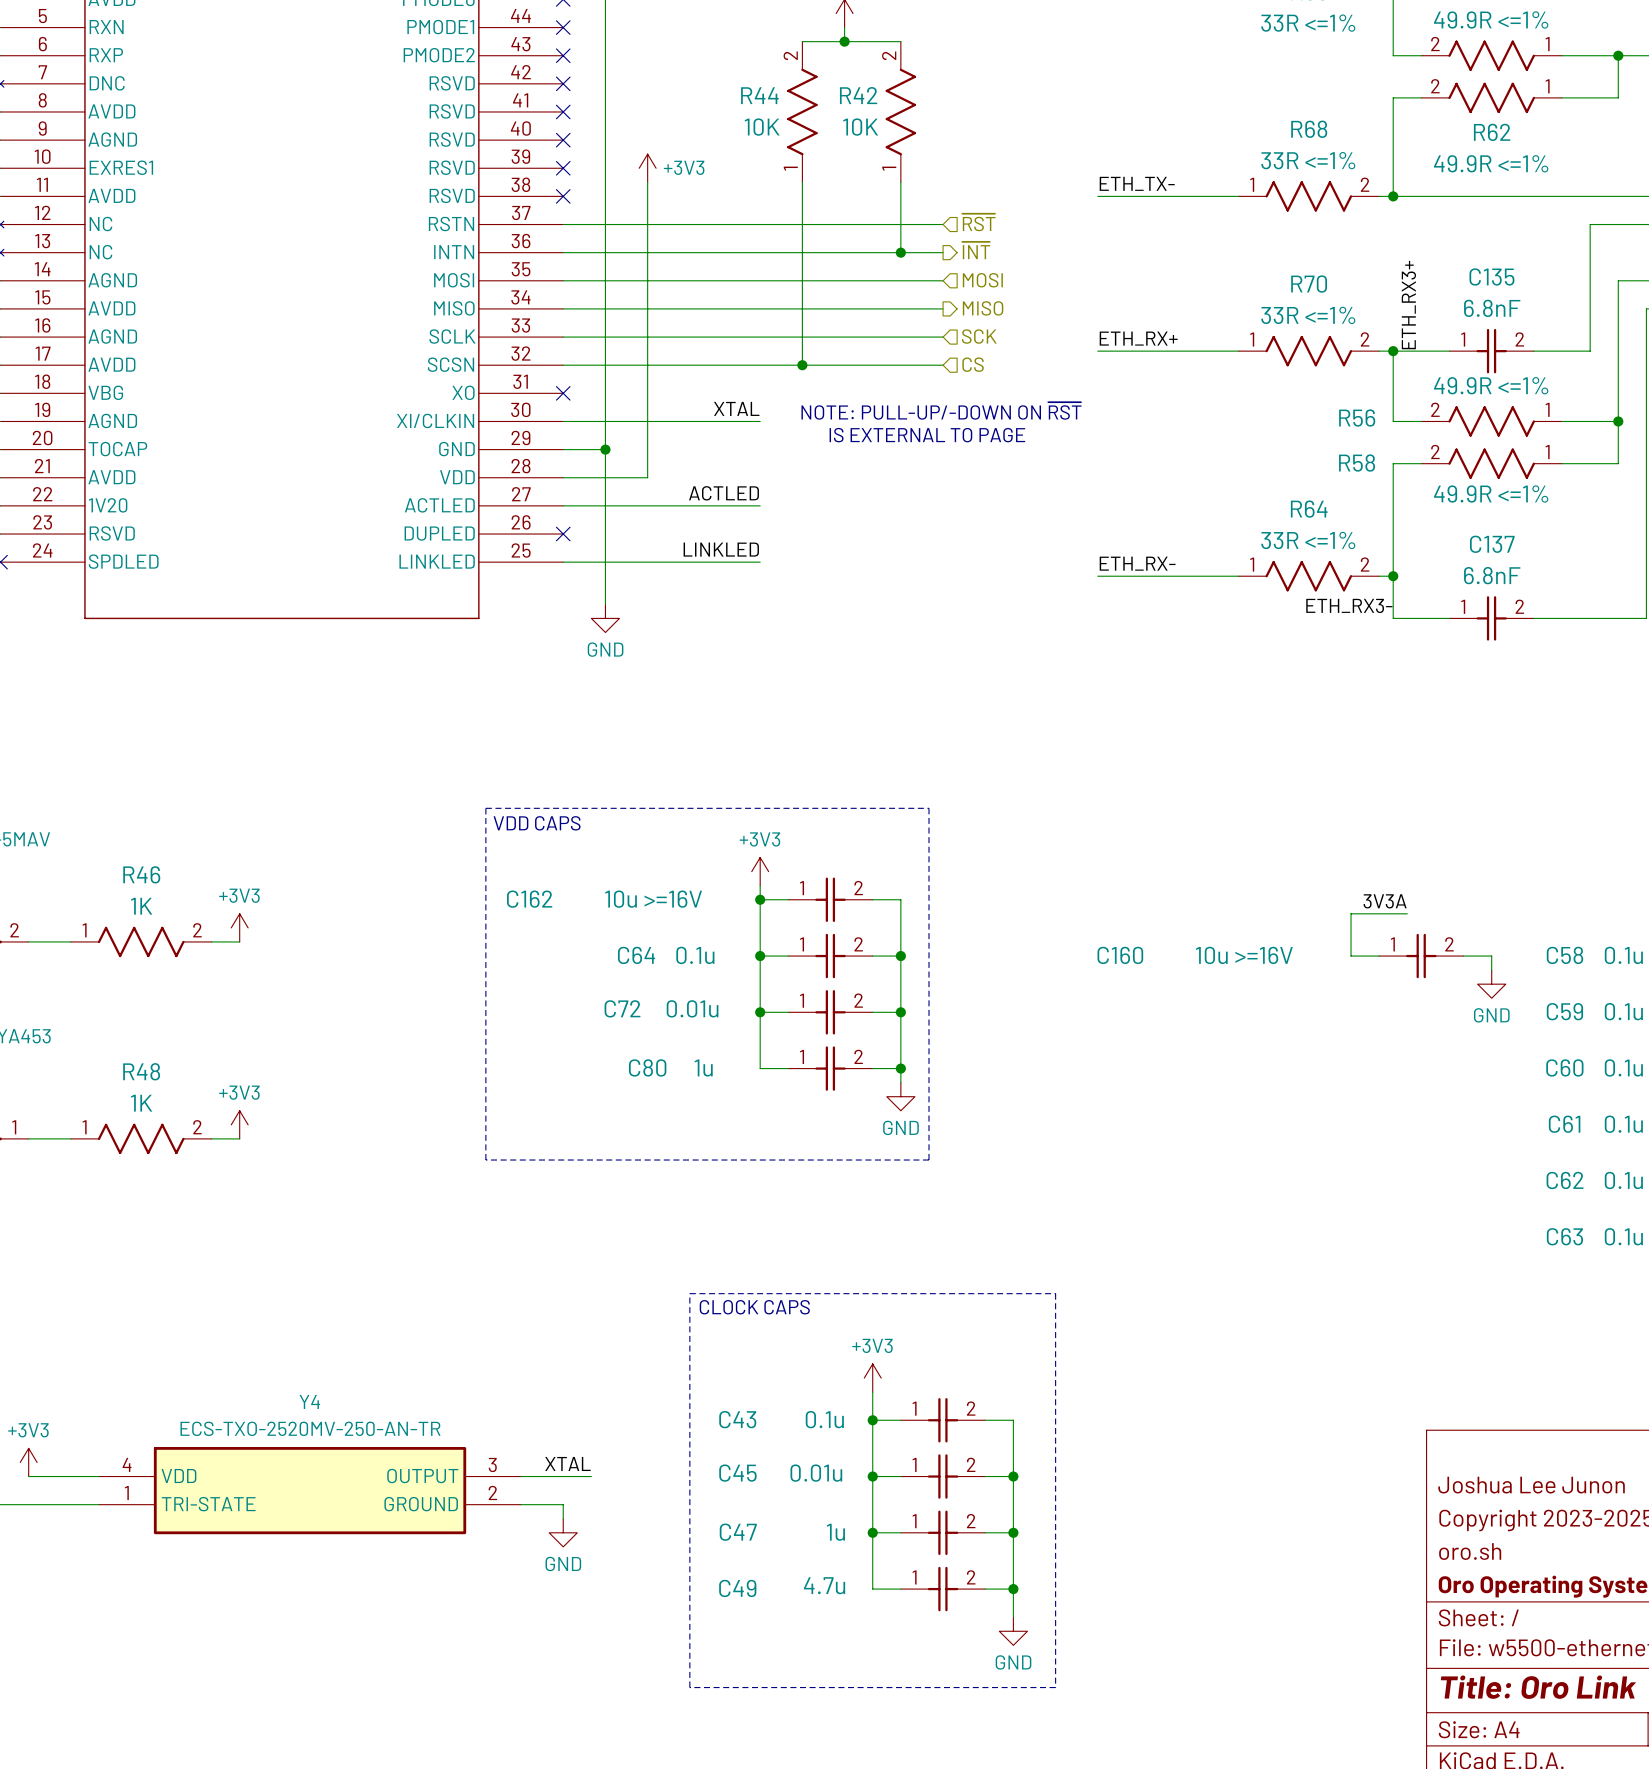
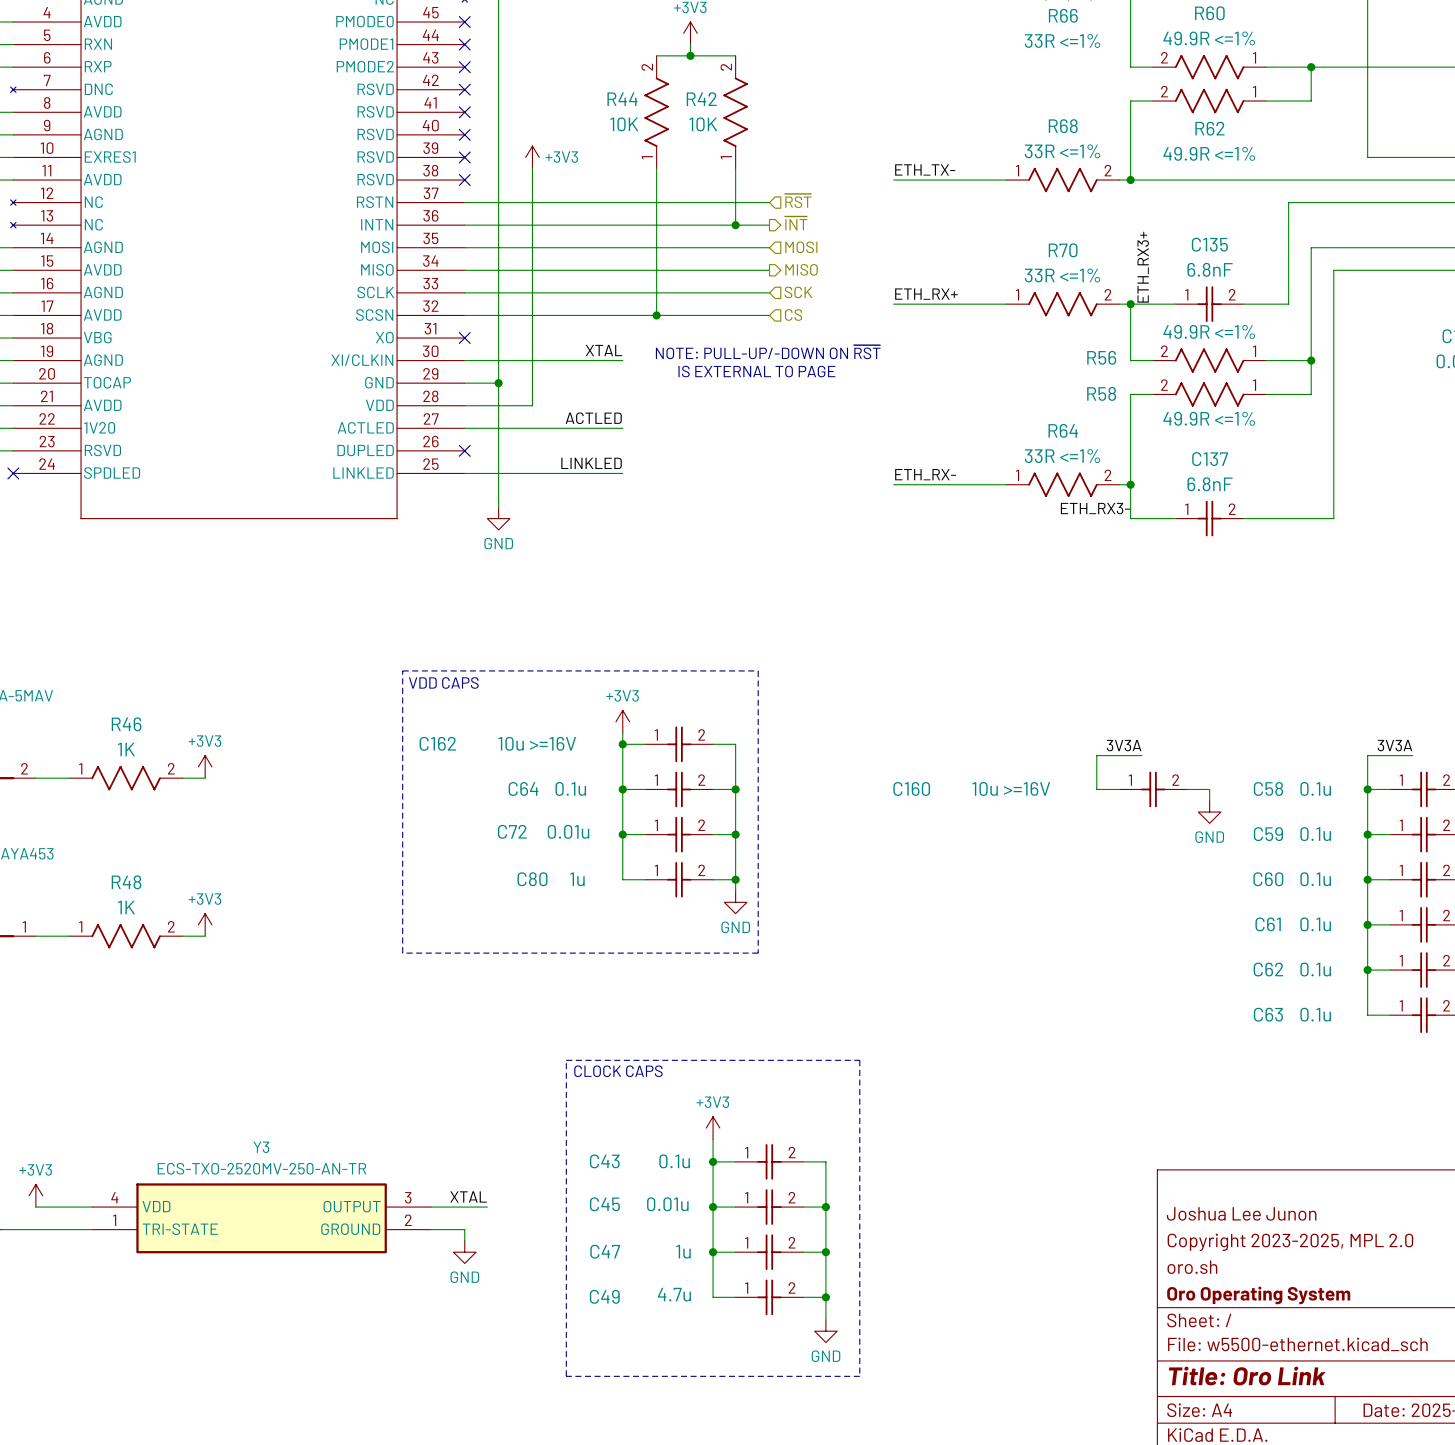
Y4 name: Y4 (309, 1401) -> Y3 (261, 1147)

